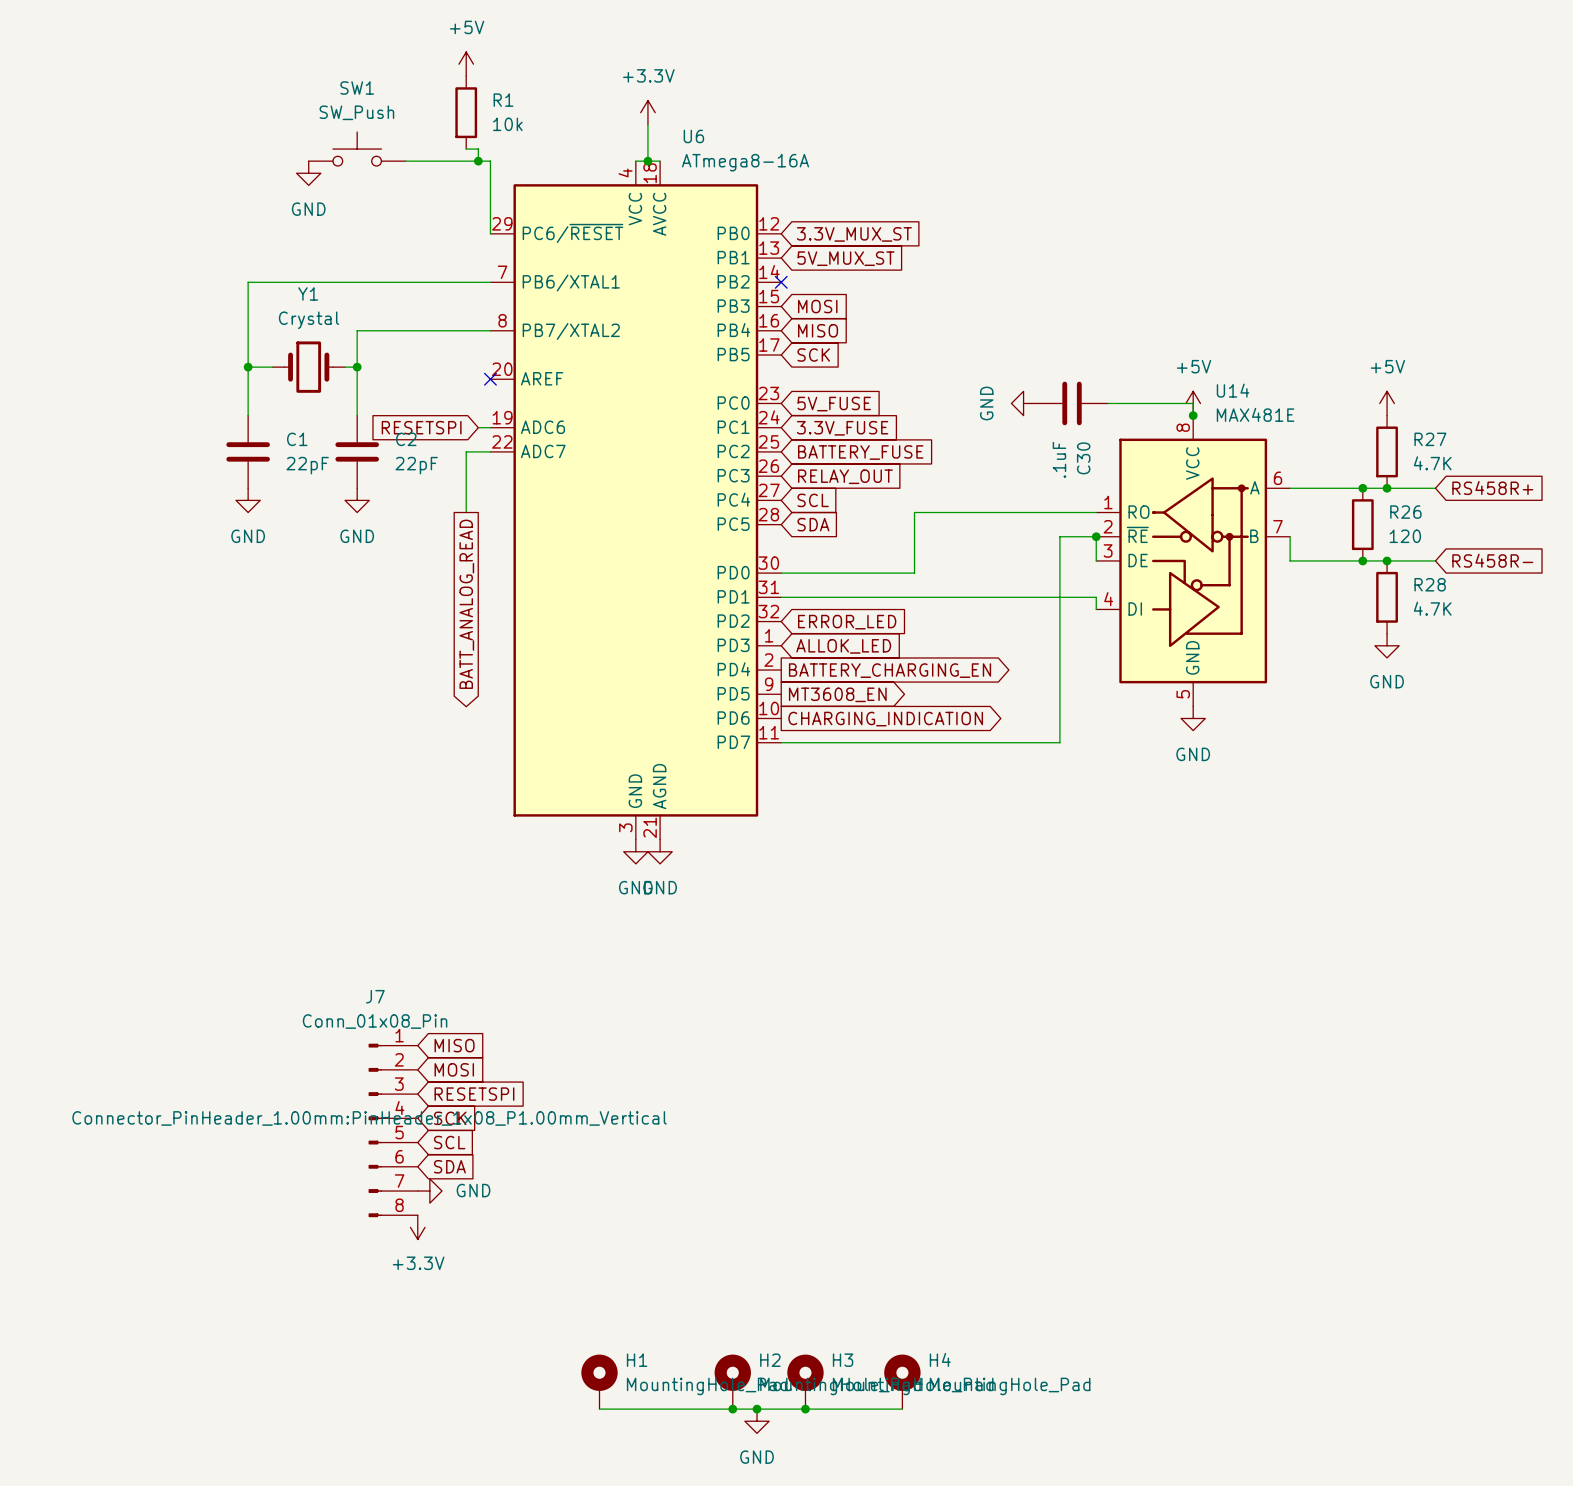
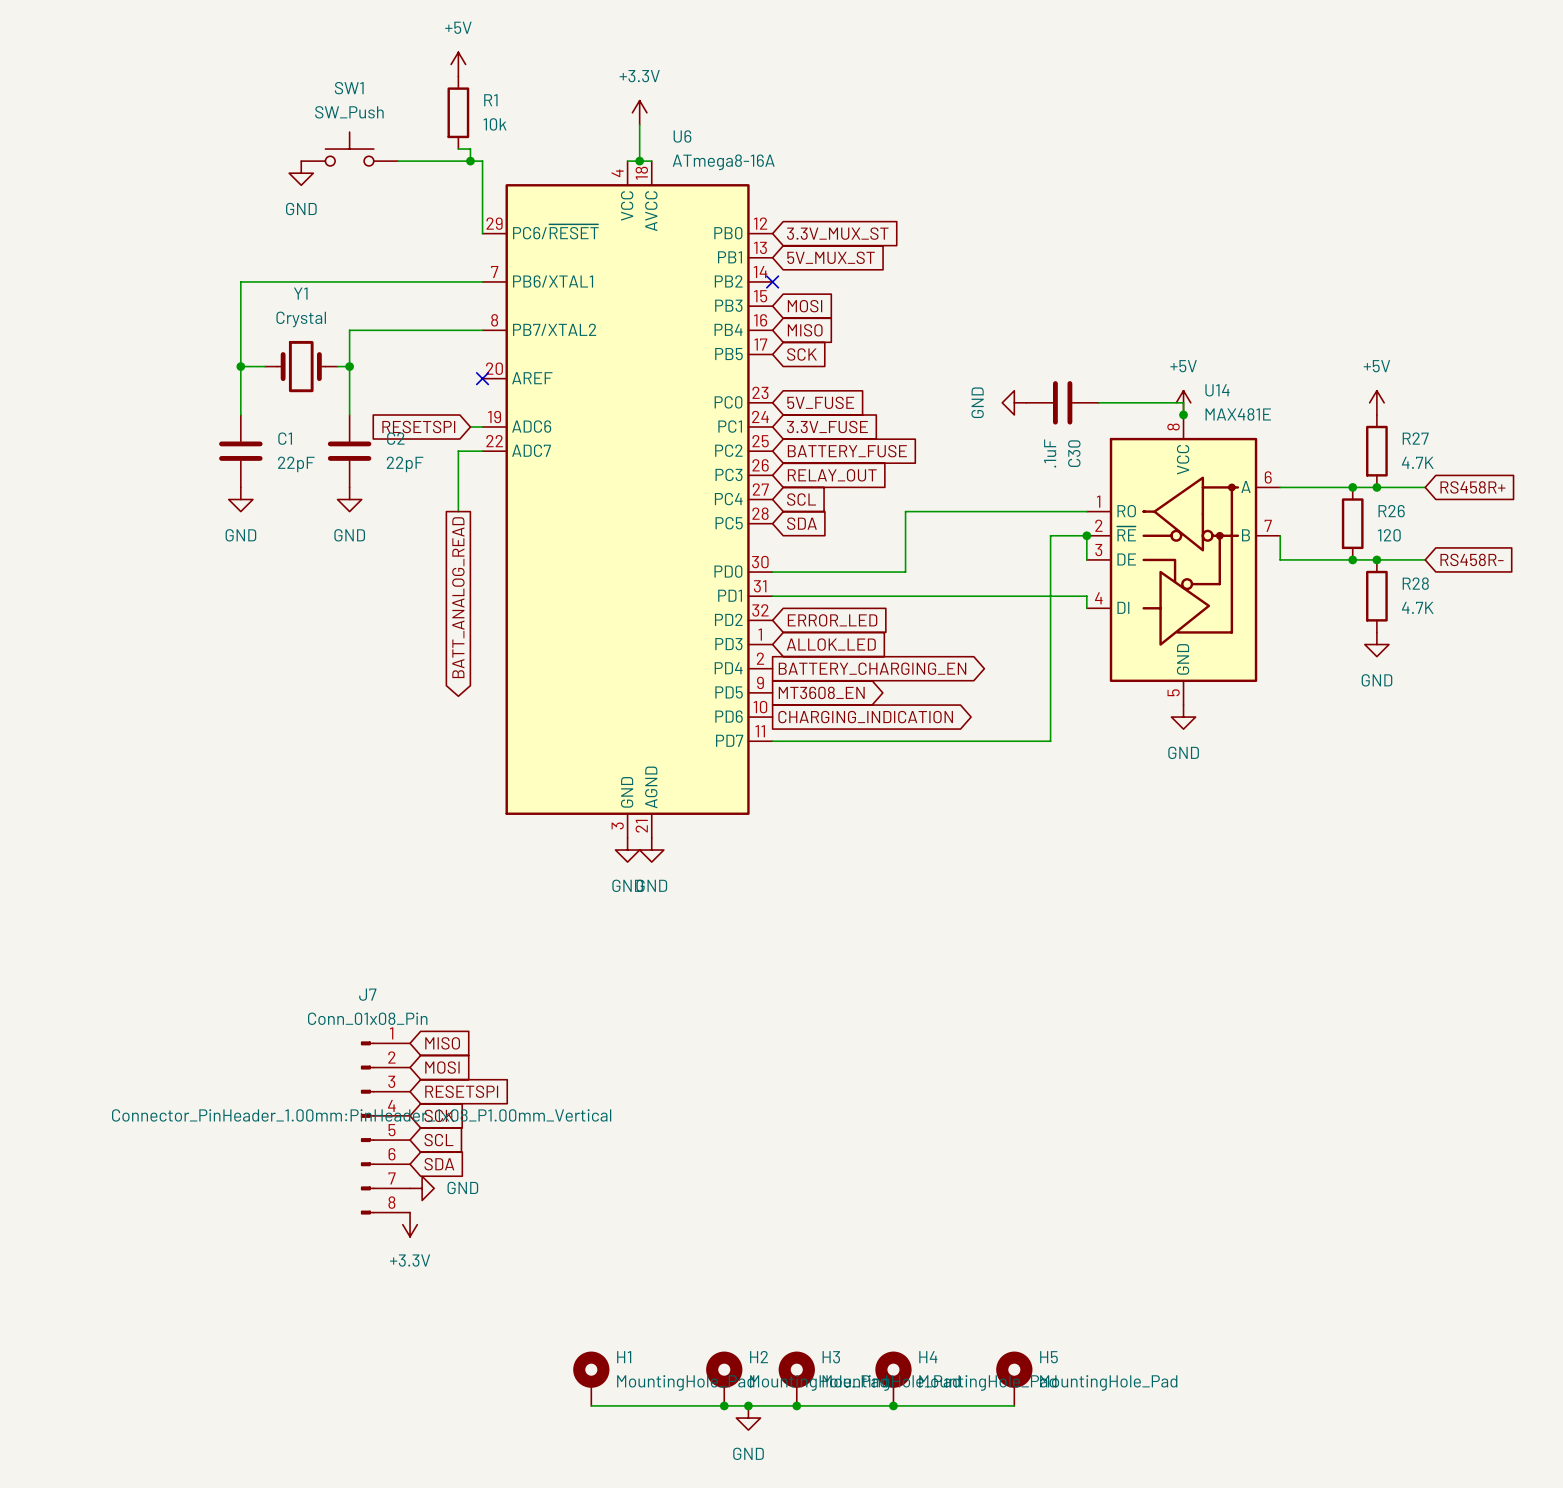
H5: none -> MountingHole_Pad (1014, 1378)
wire: none -> (893, 1405) (1014, 1405)
junction: none -> (893, 1405)

